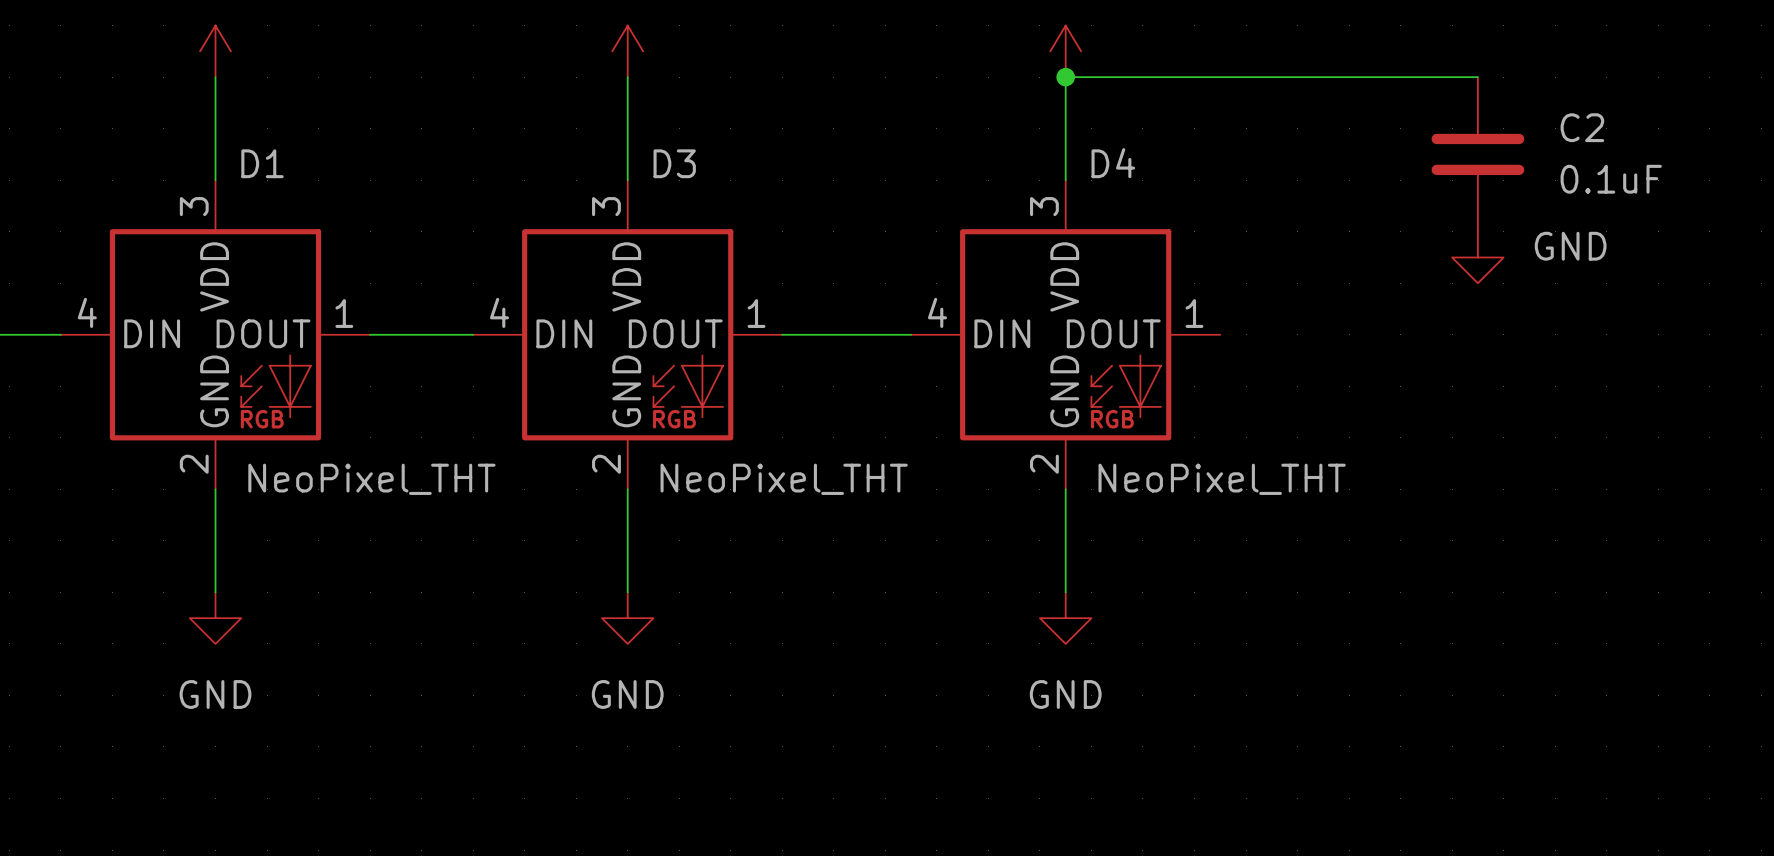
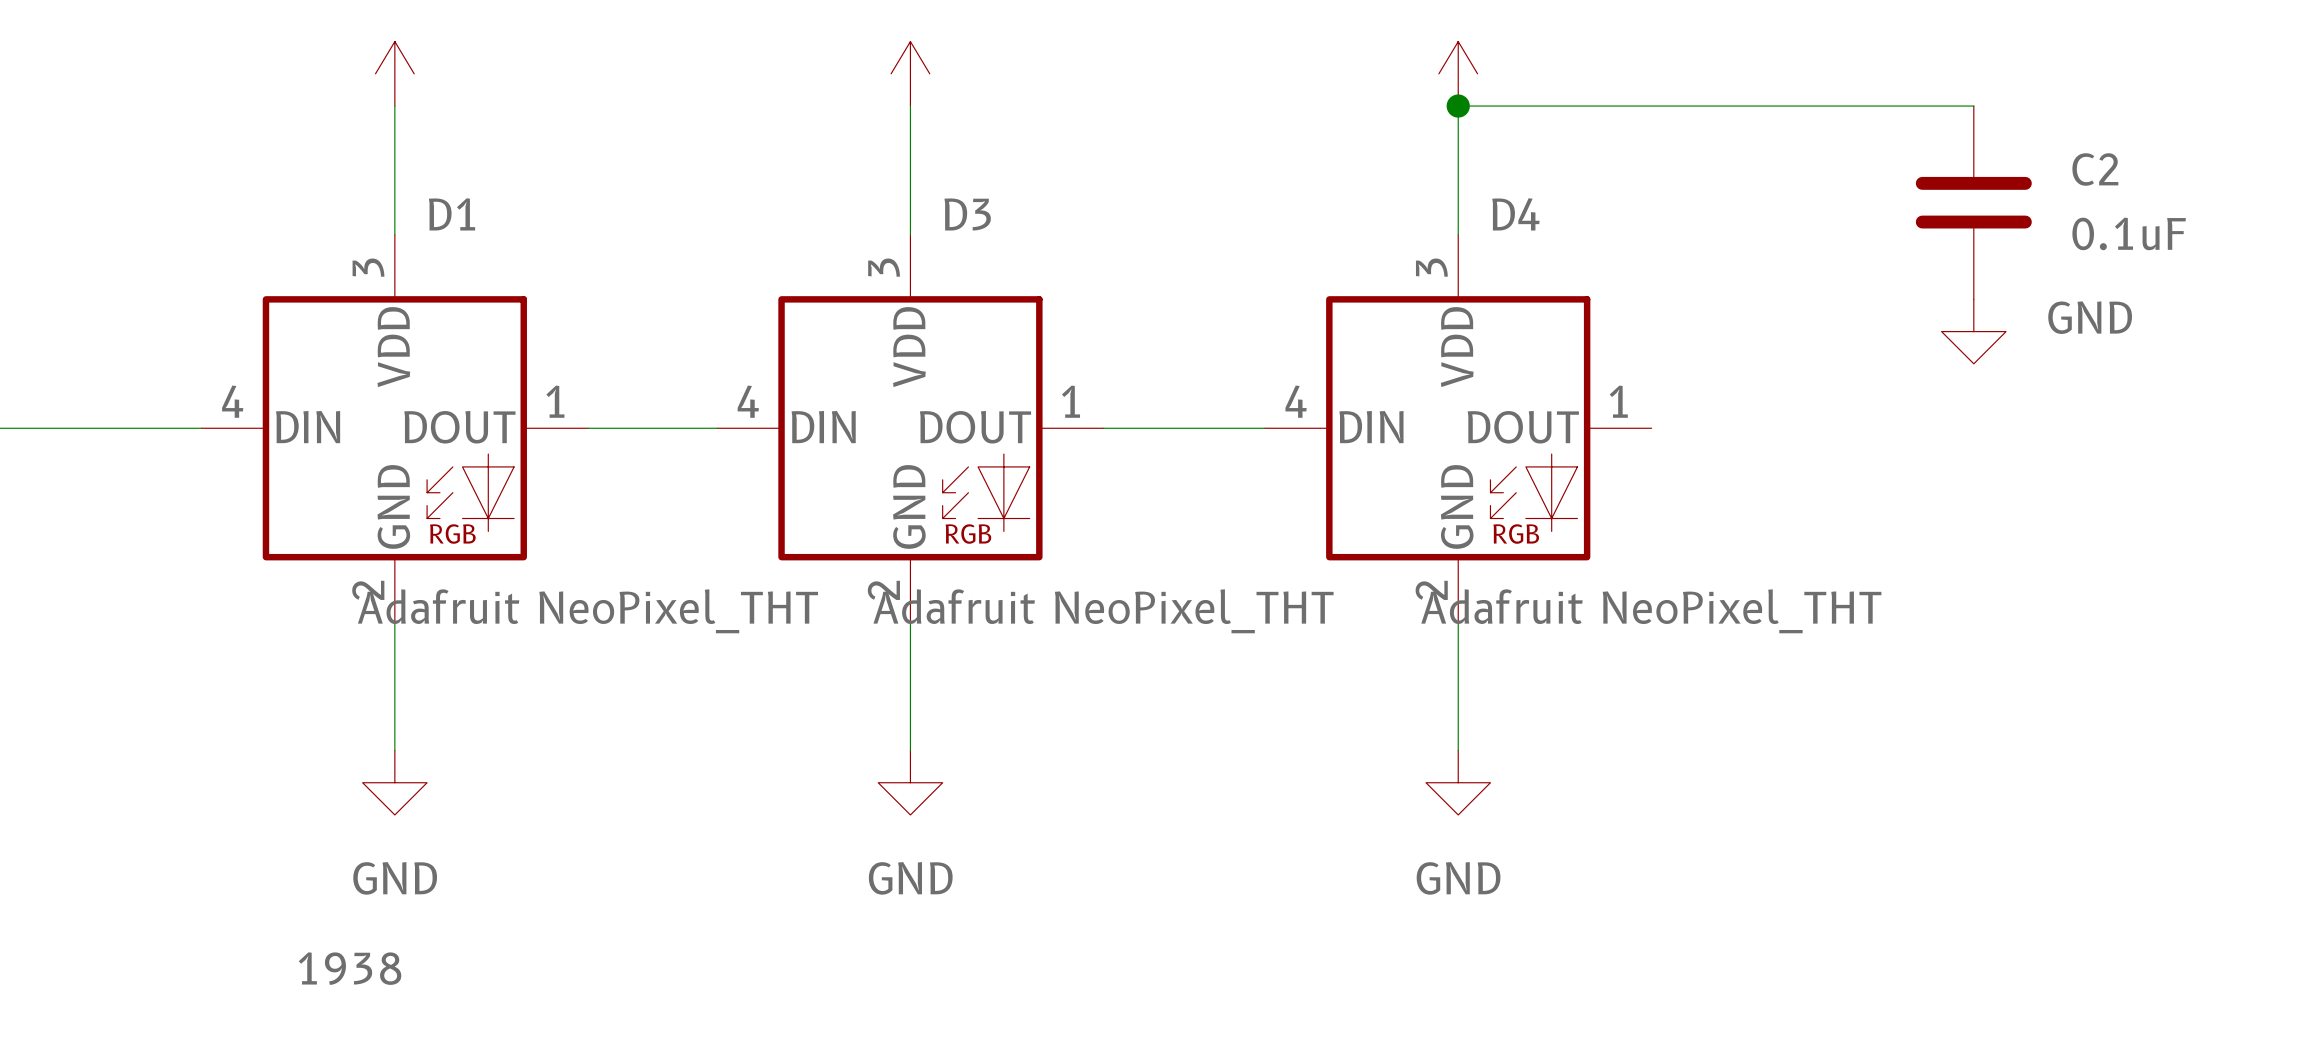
D1 value: NeoPixel_THT (371, 479) -> Adafruit NeoPixel_THT (587, 611)
D3 value: NeoPixel_THT (784, 479) -> Adafruit NeoPixel_THT (1103, 611)
D4 value: NeoPixel_THT (1222, 479) -> Adafruit NeoPixel_THT (1651, 611)
D1 text: none -> 1938 (350, 968)

